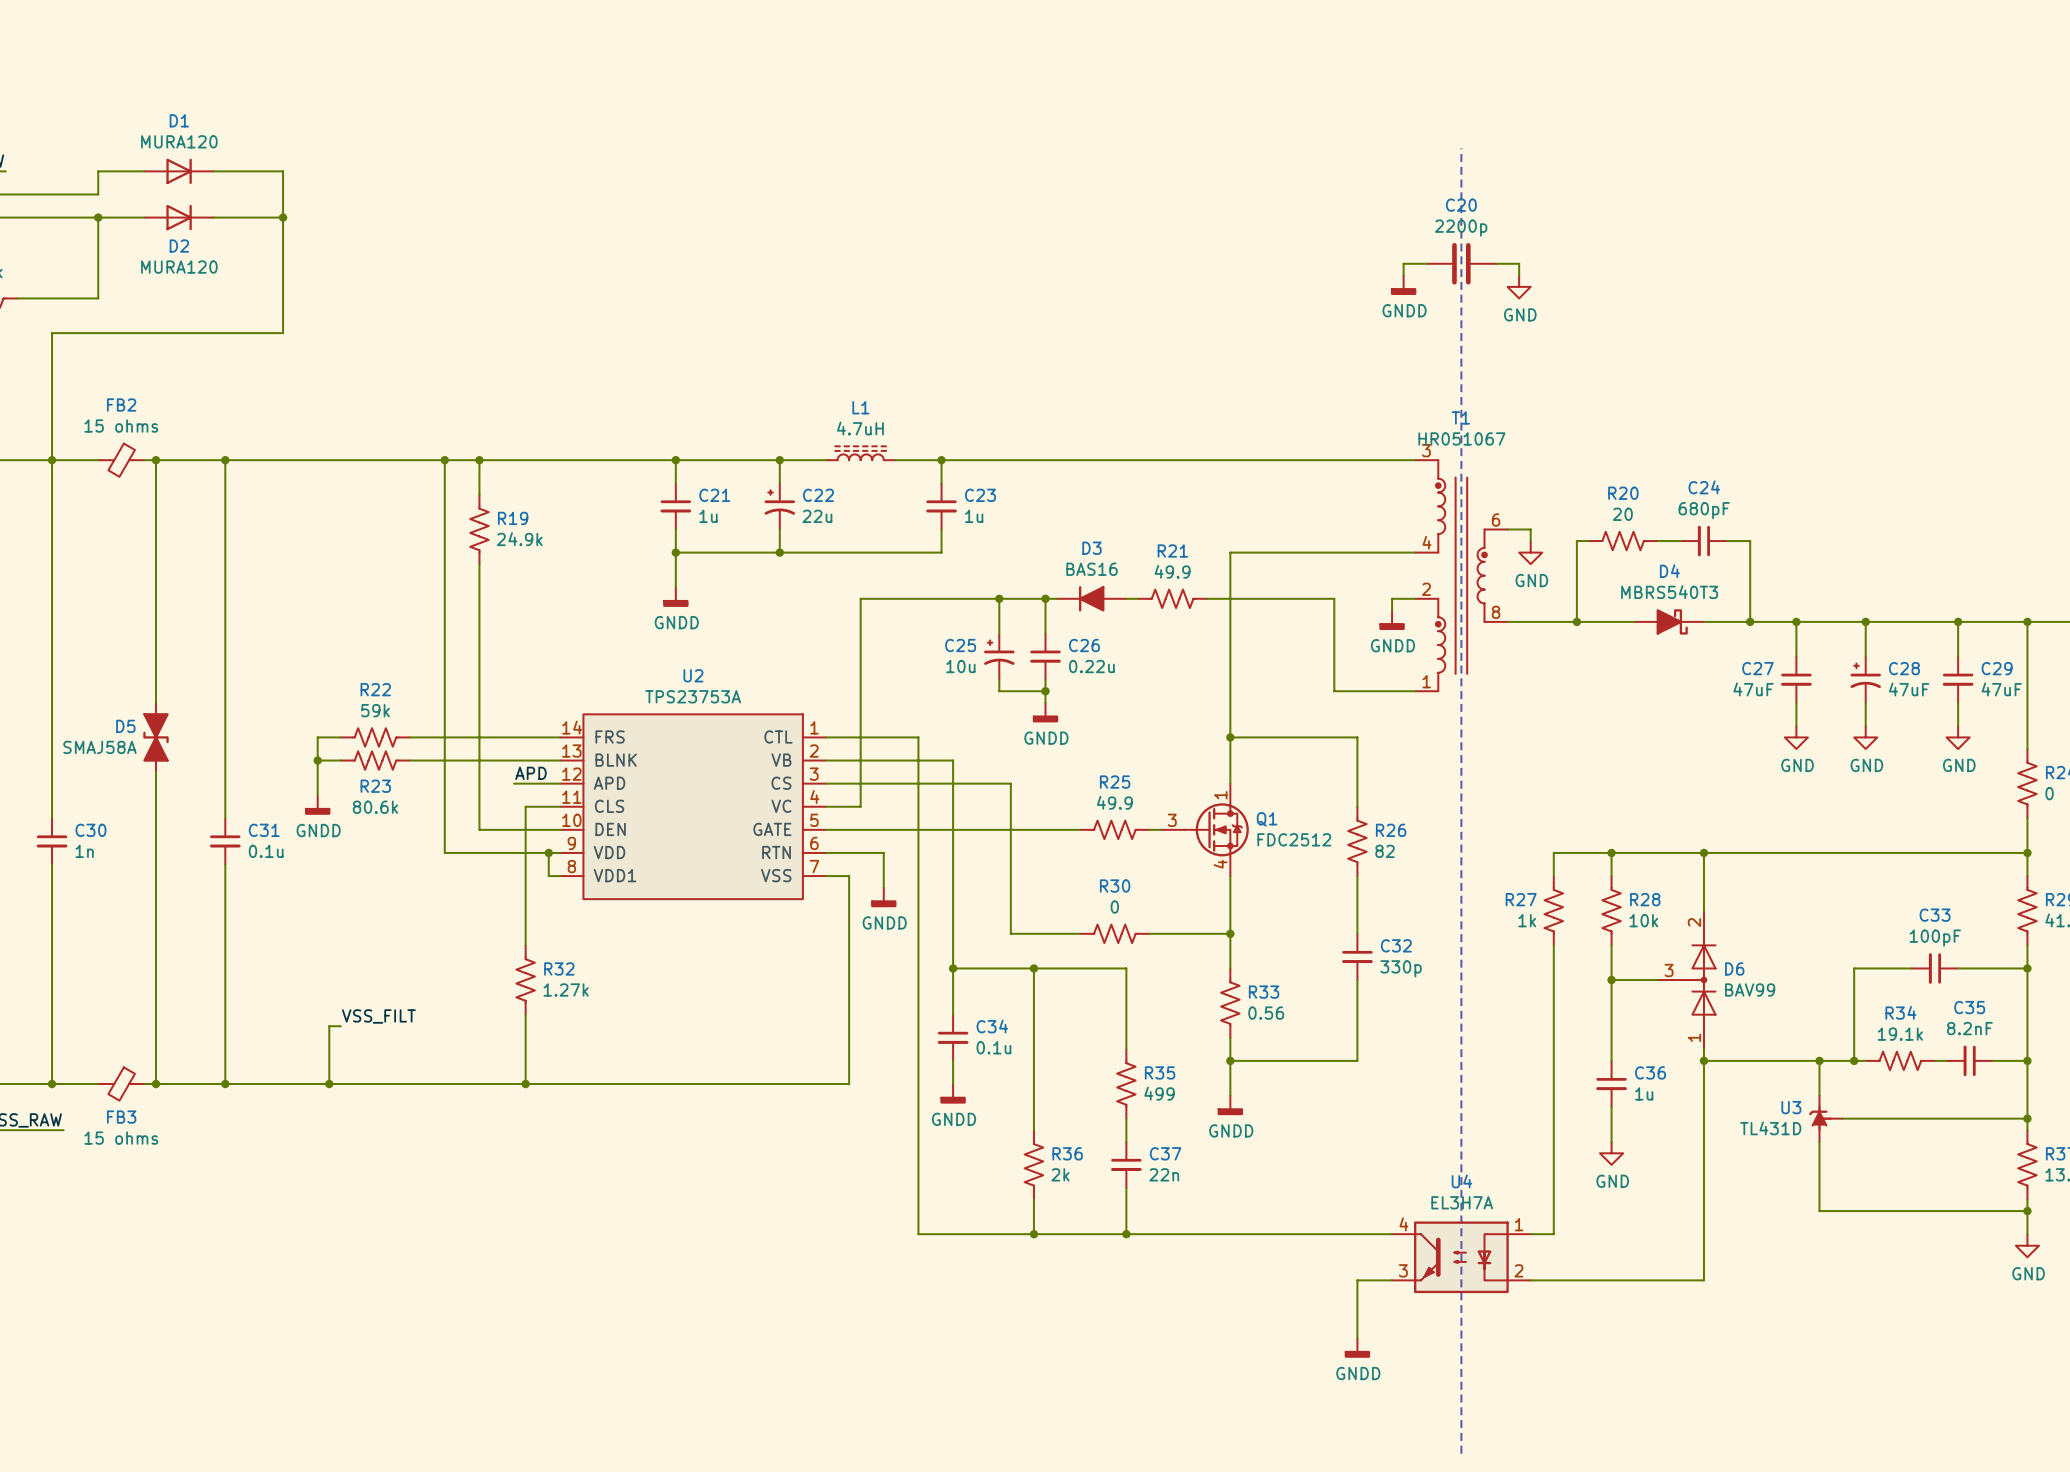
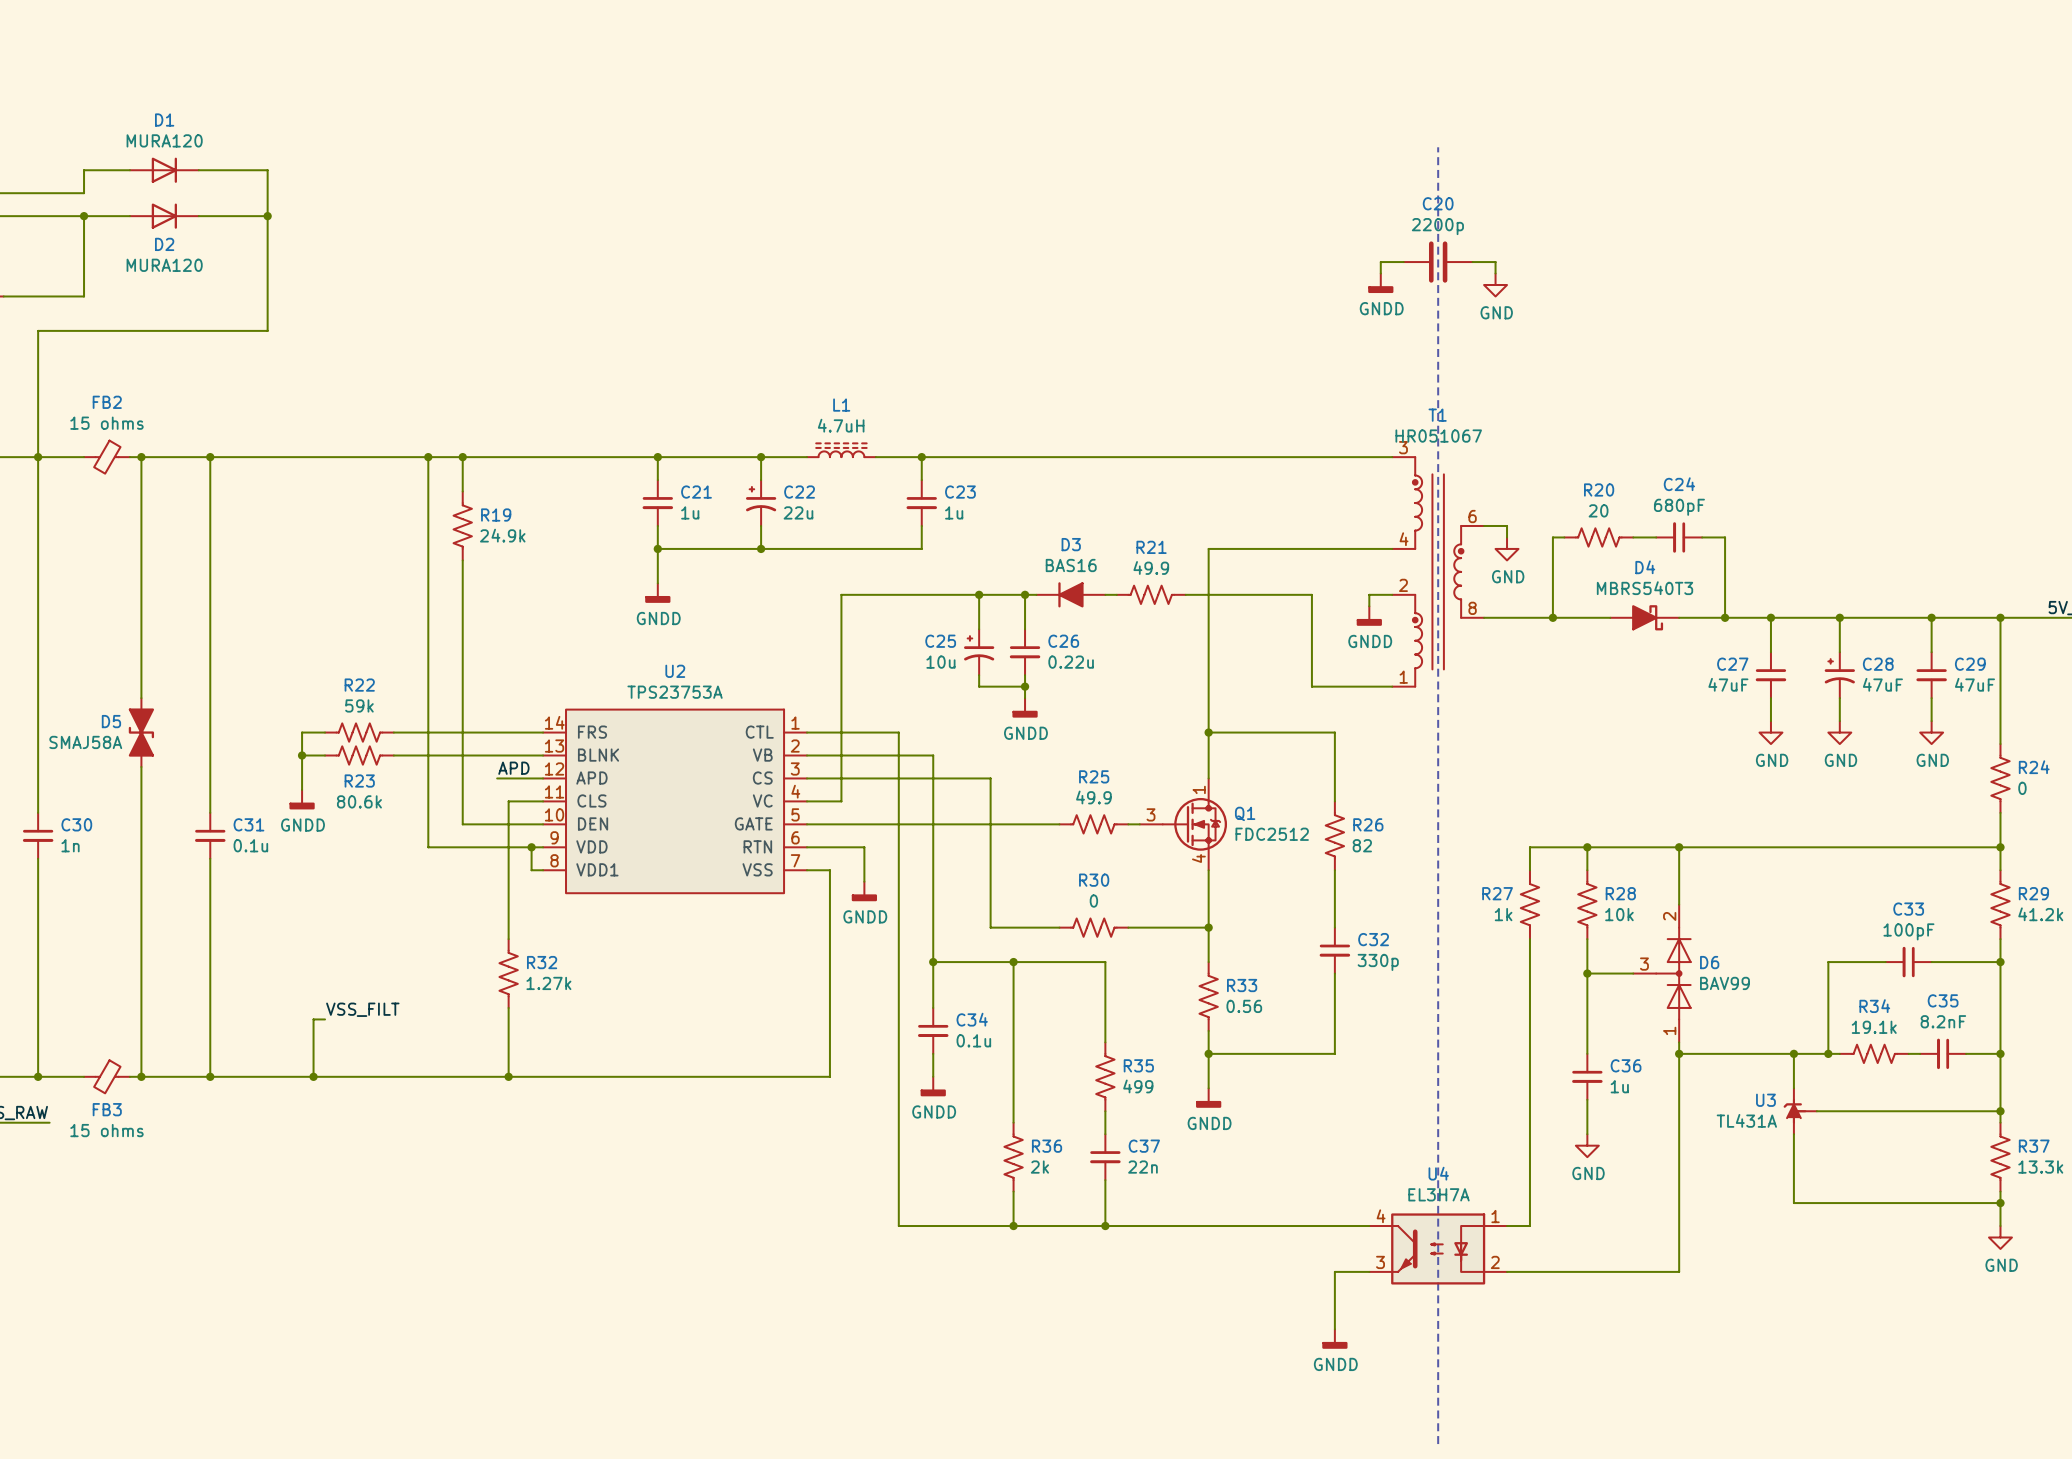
U3 value: TL431D (1770, 1128) -> TL431A (1746, 1120)

